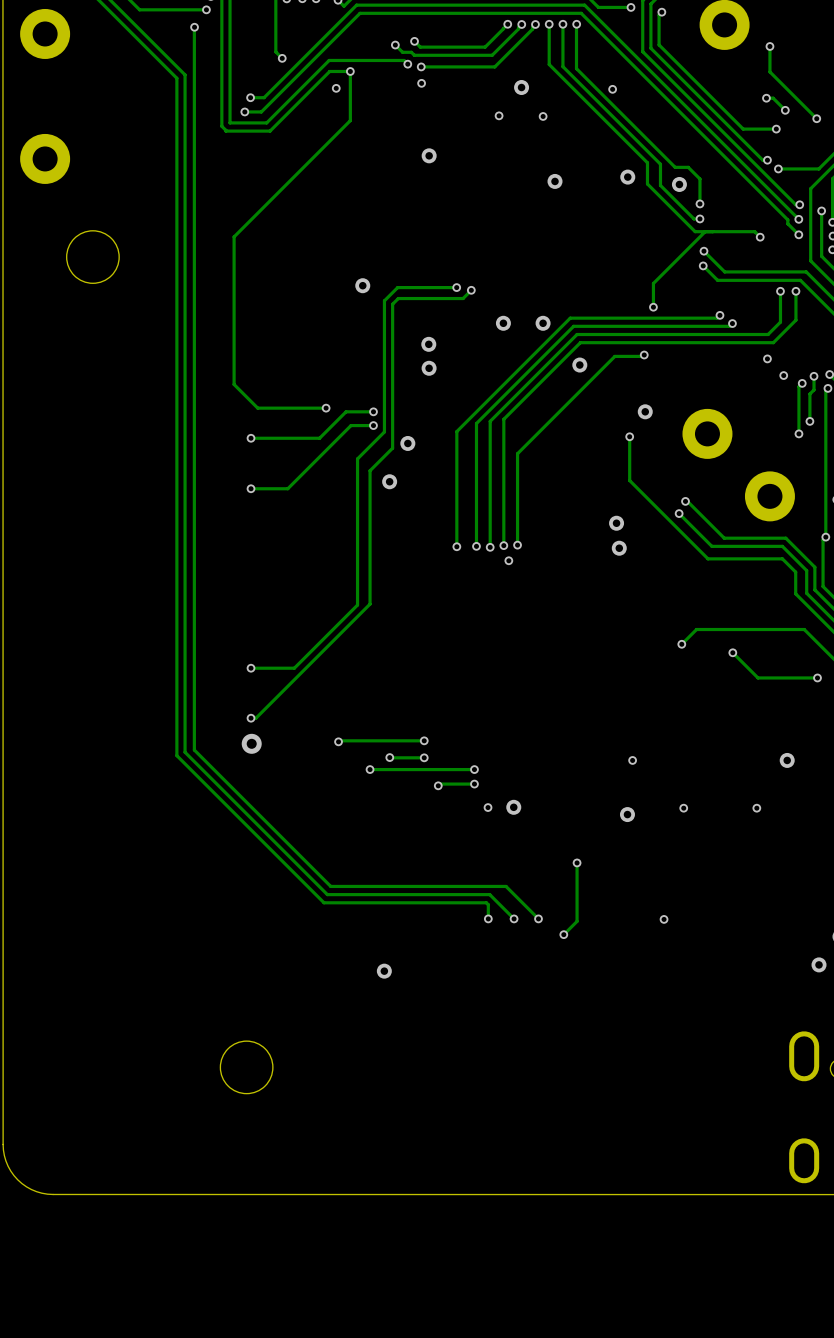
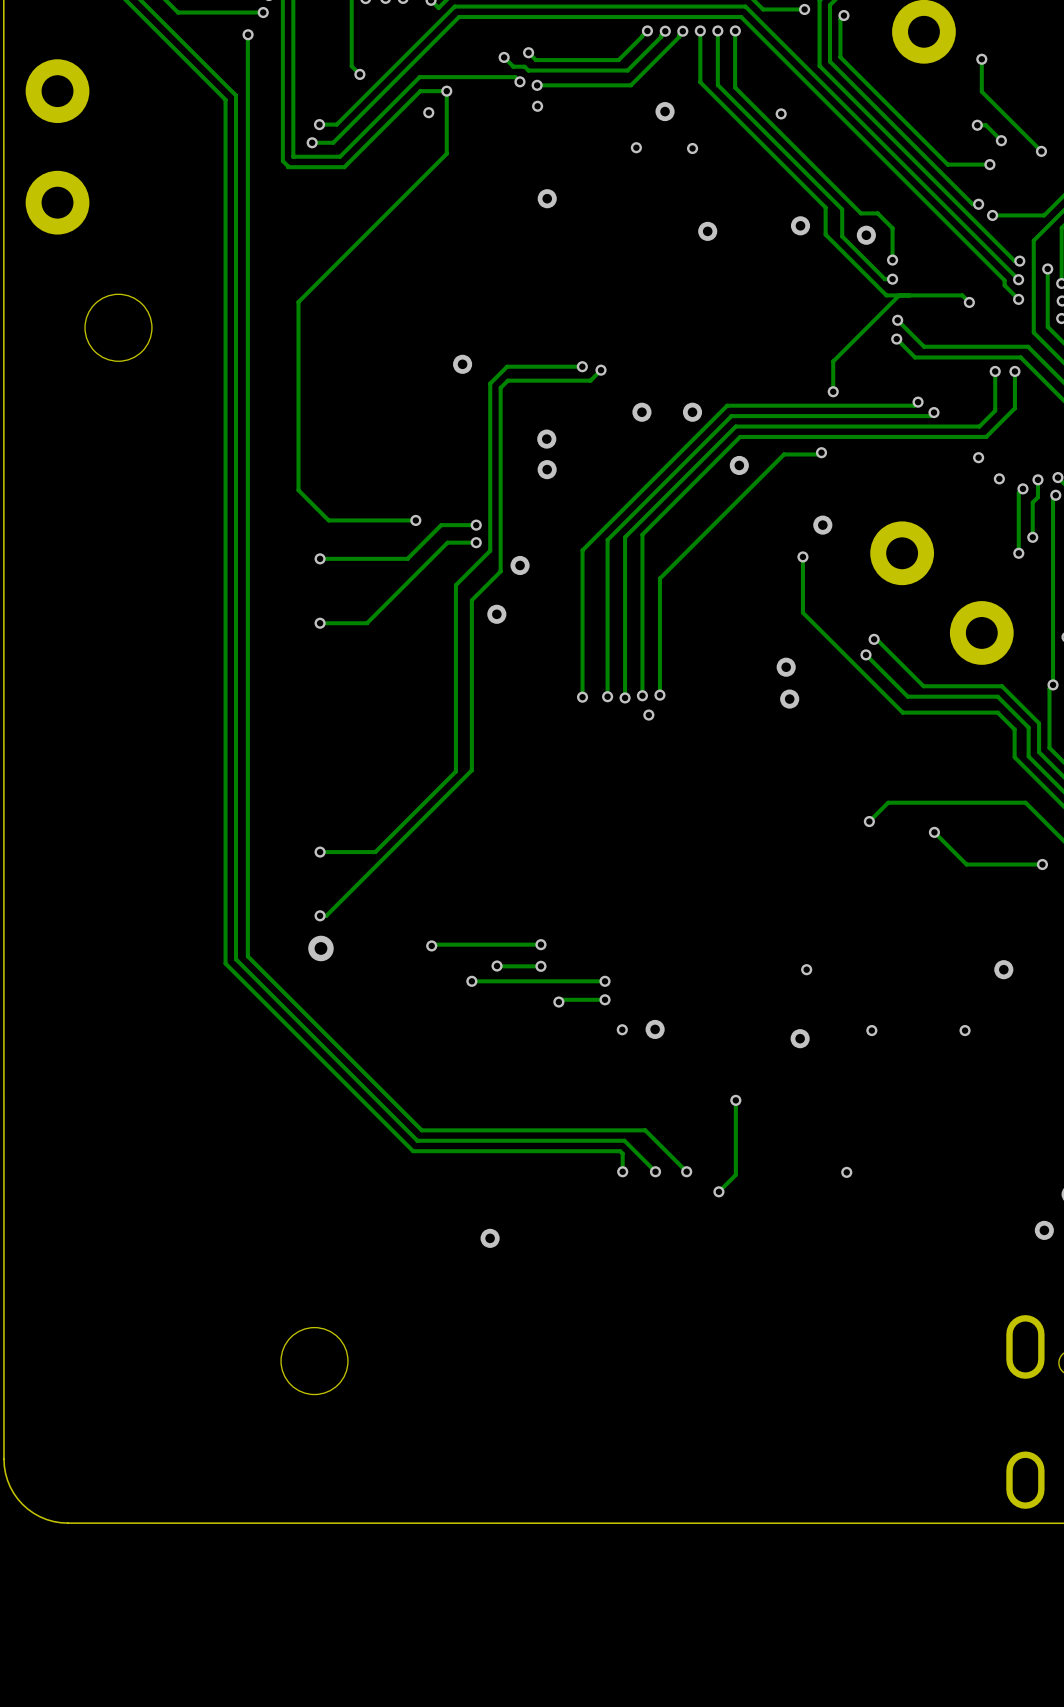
part position: (45, 33) -> (57, 91)

